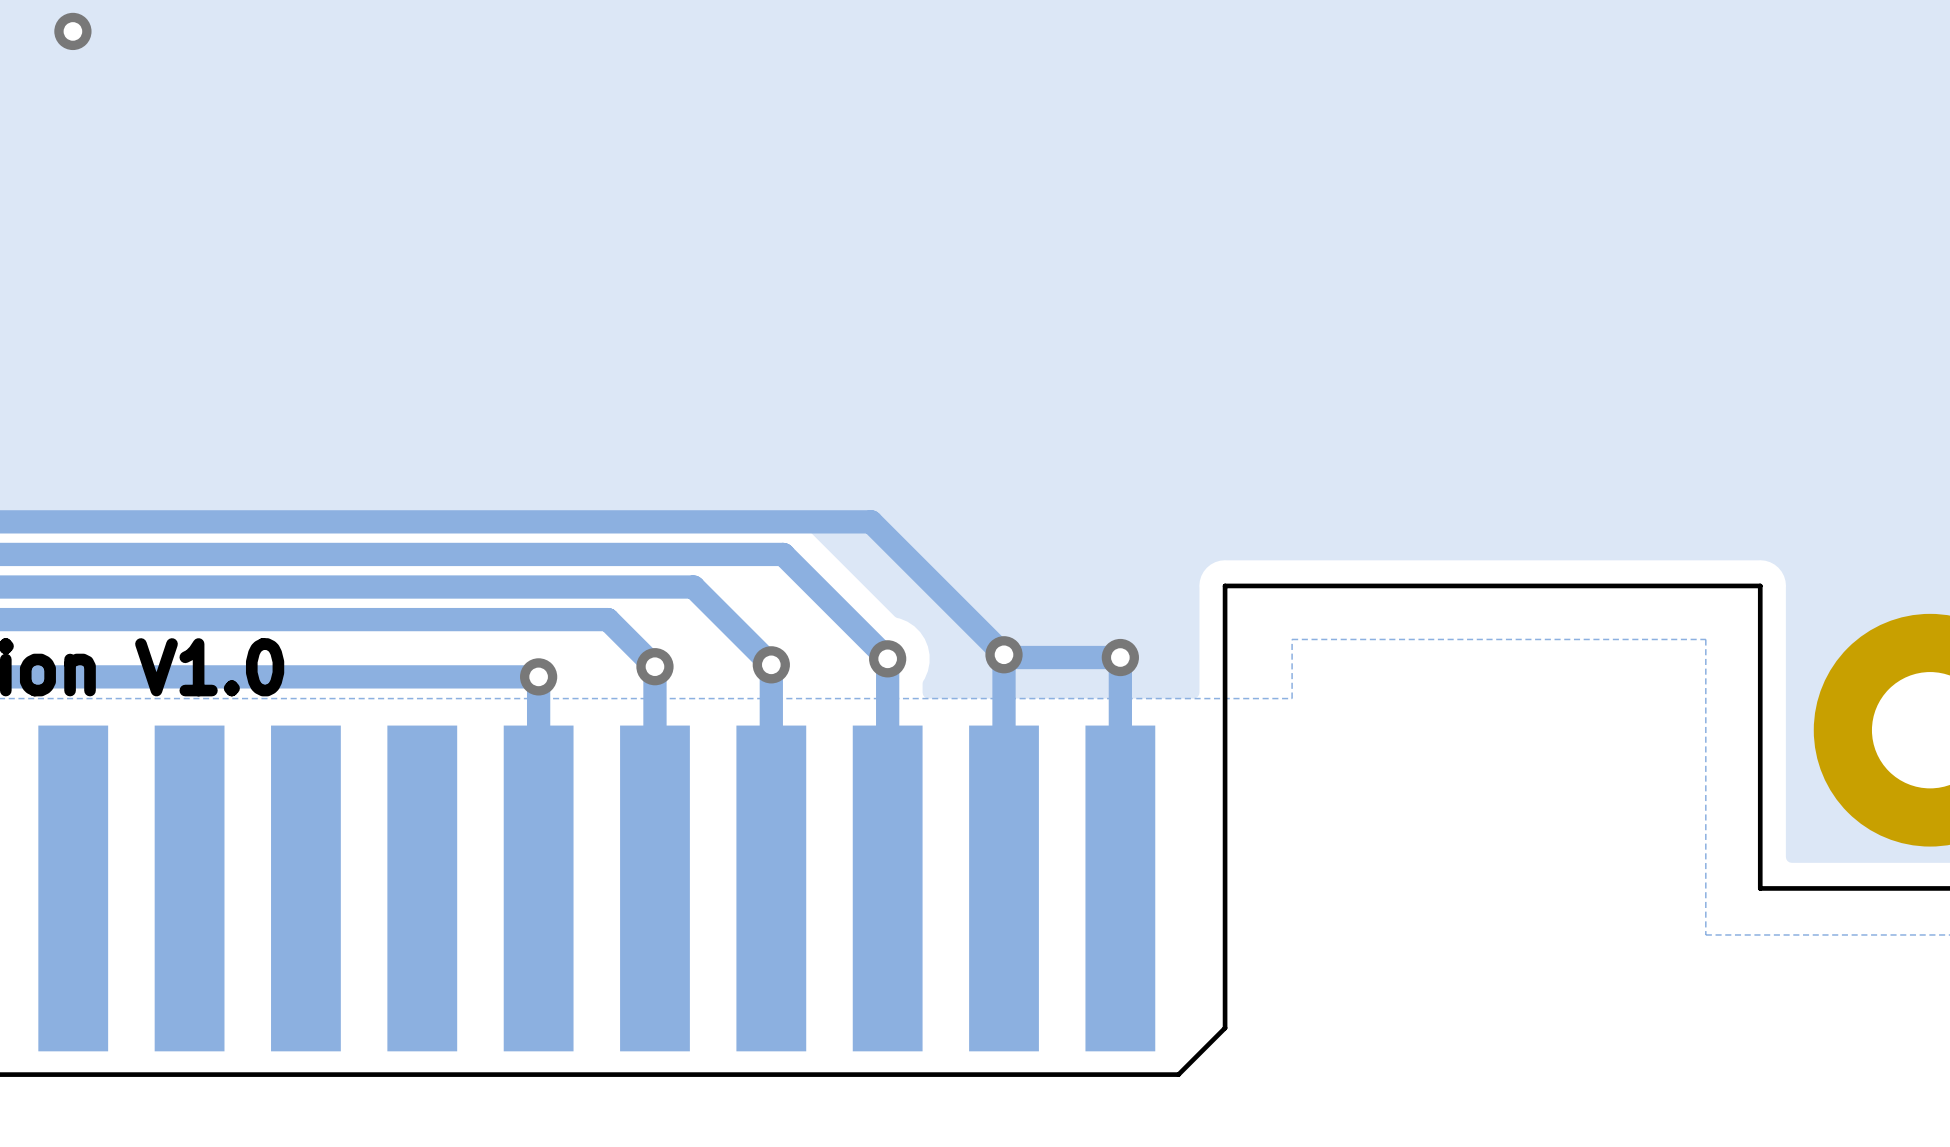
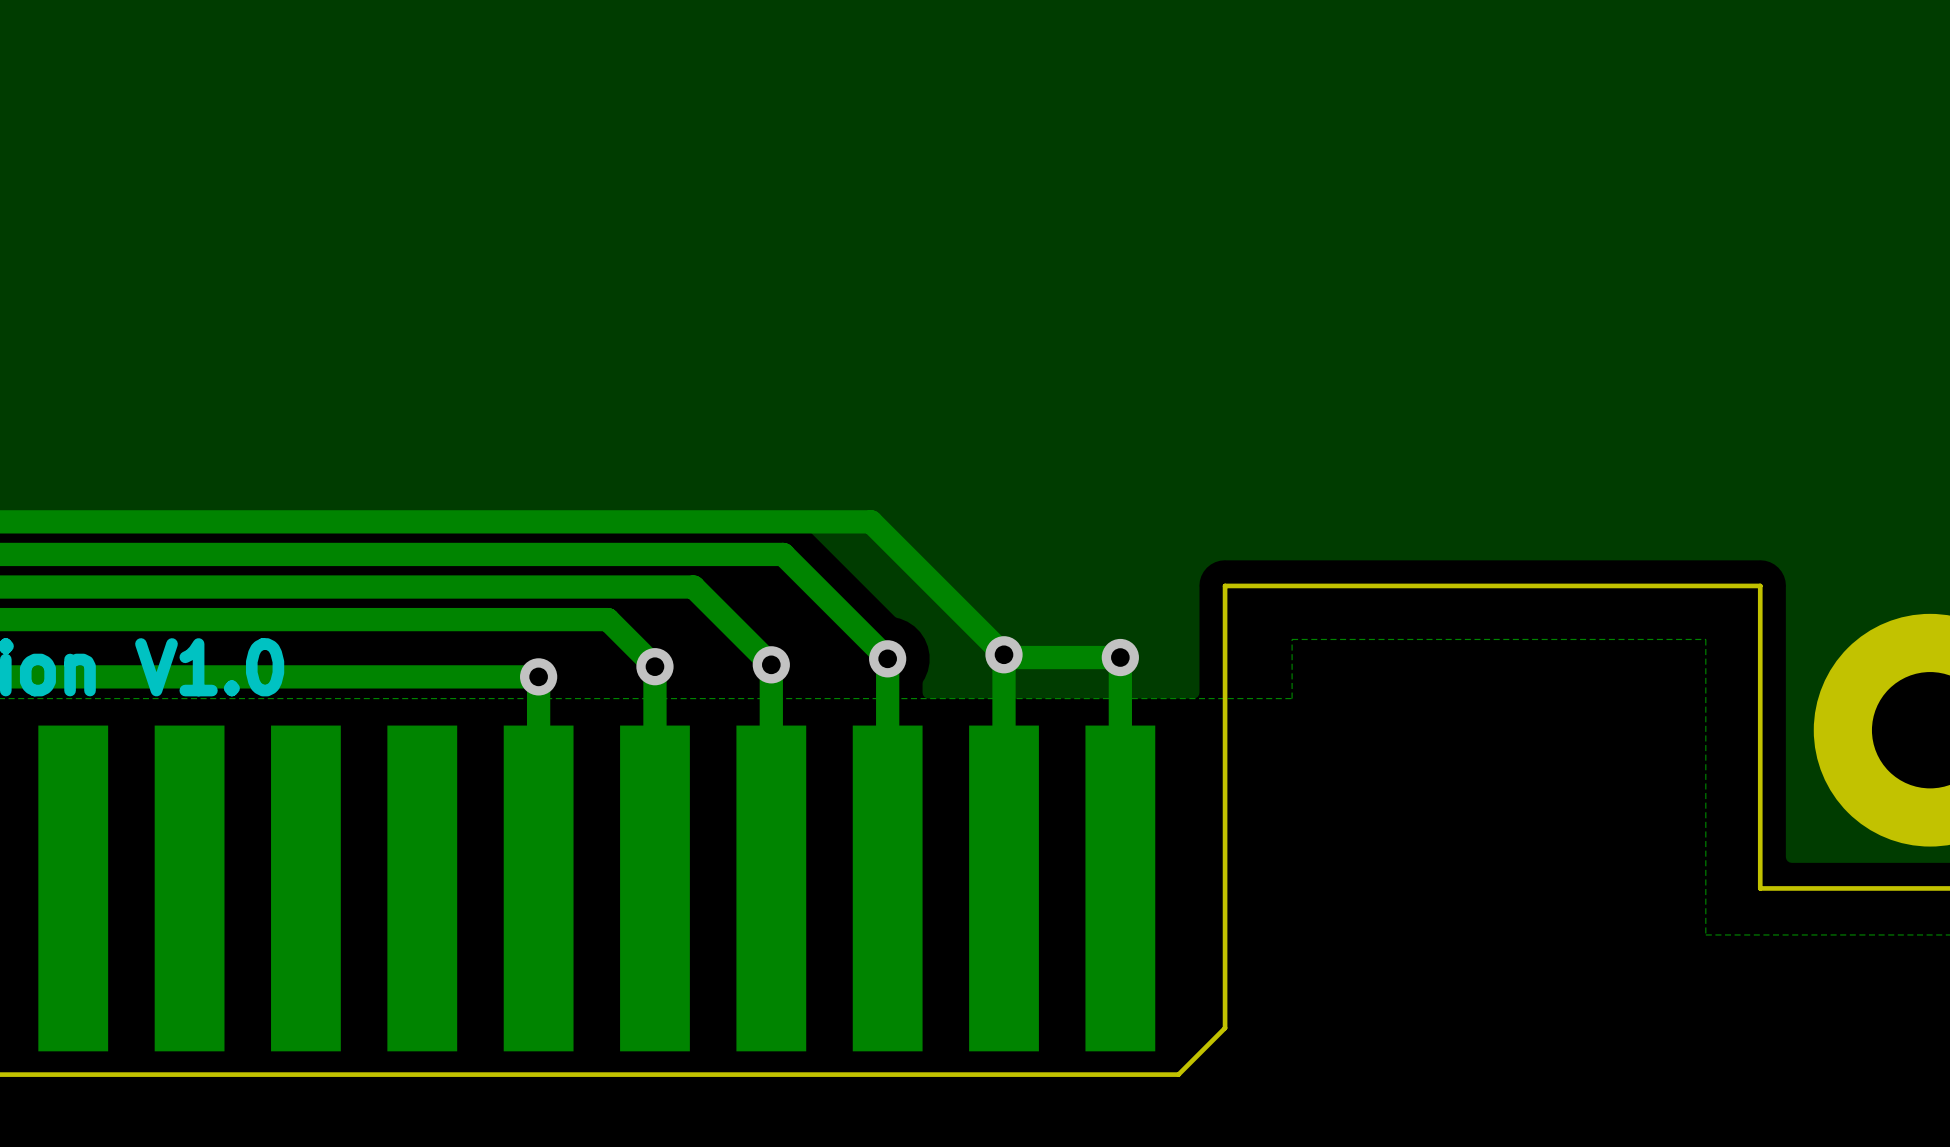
via: (72, 31) -> none

